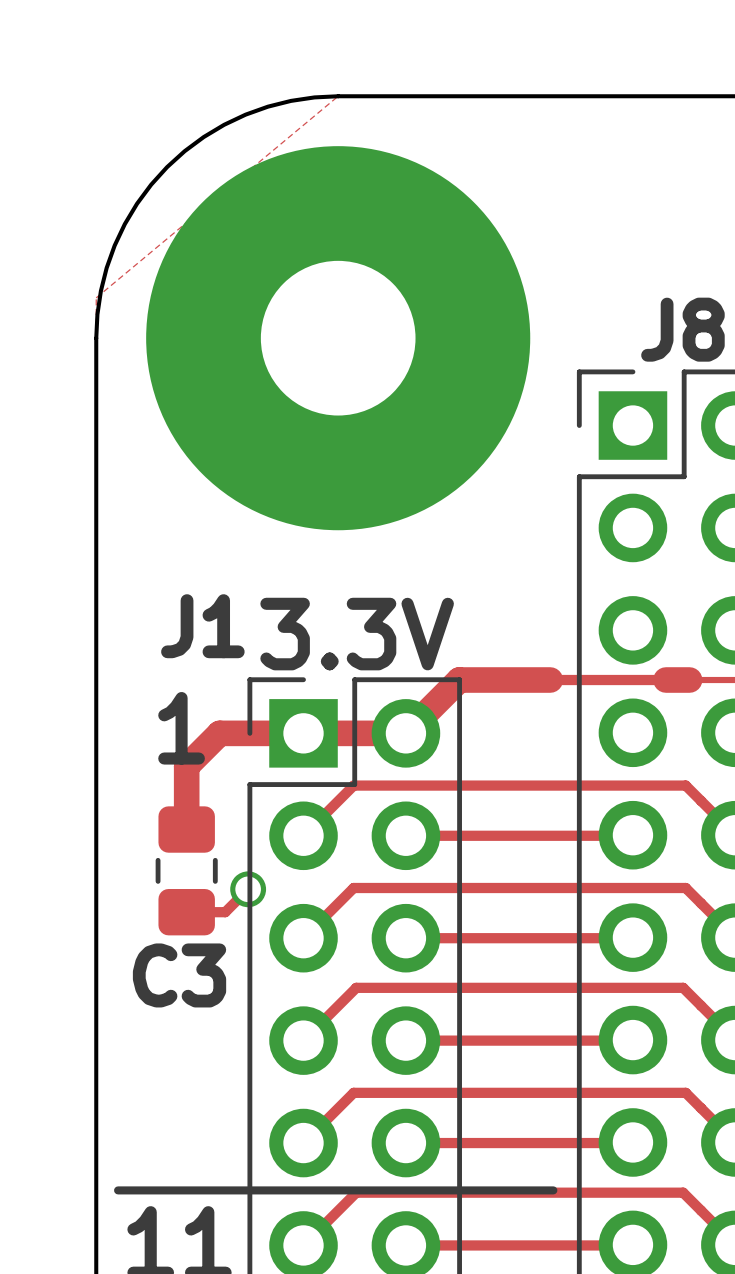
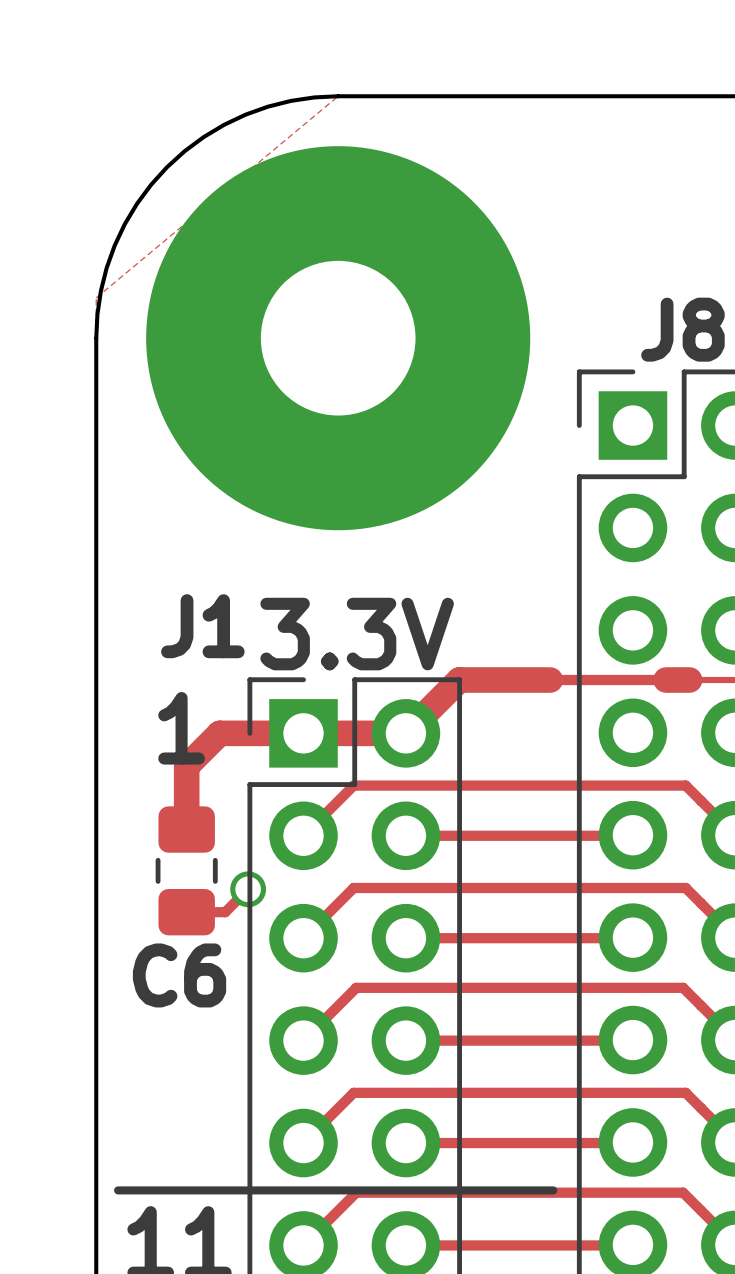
C3 name: C3 (179, 975) -> C6 (179, 975)

